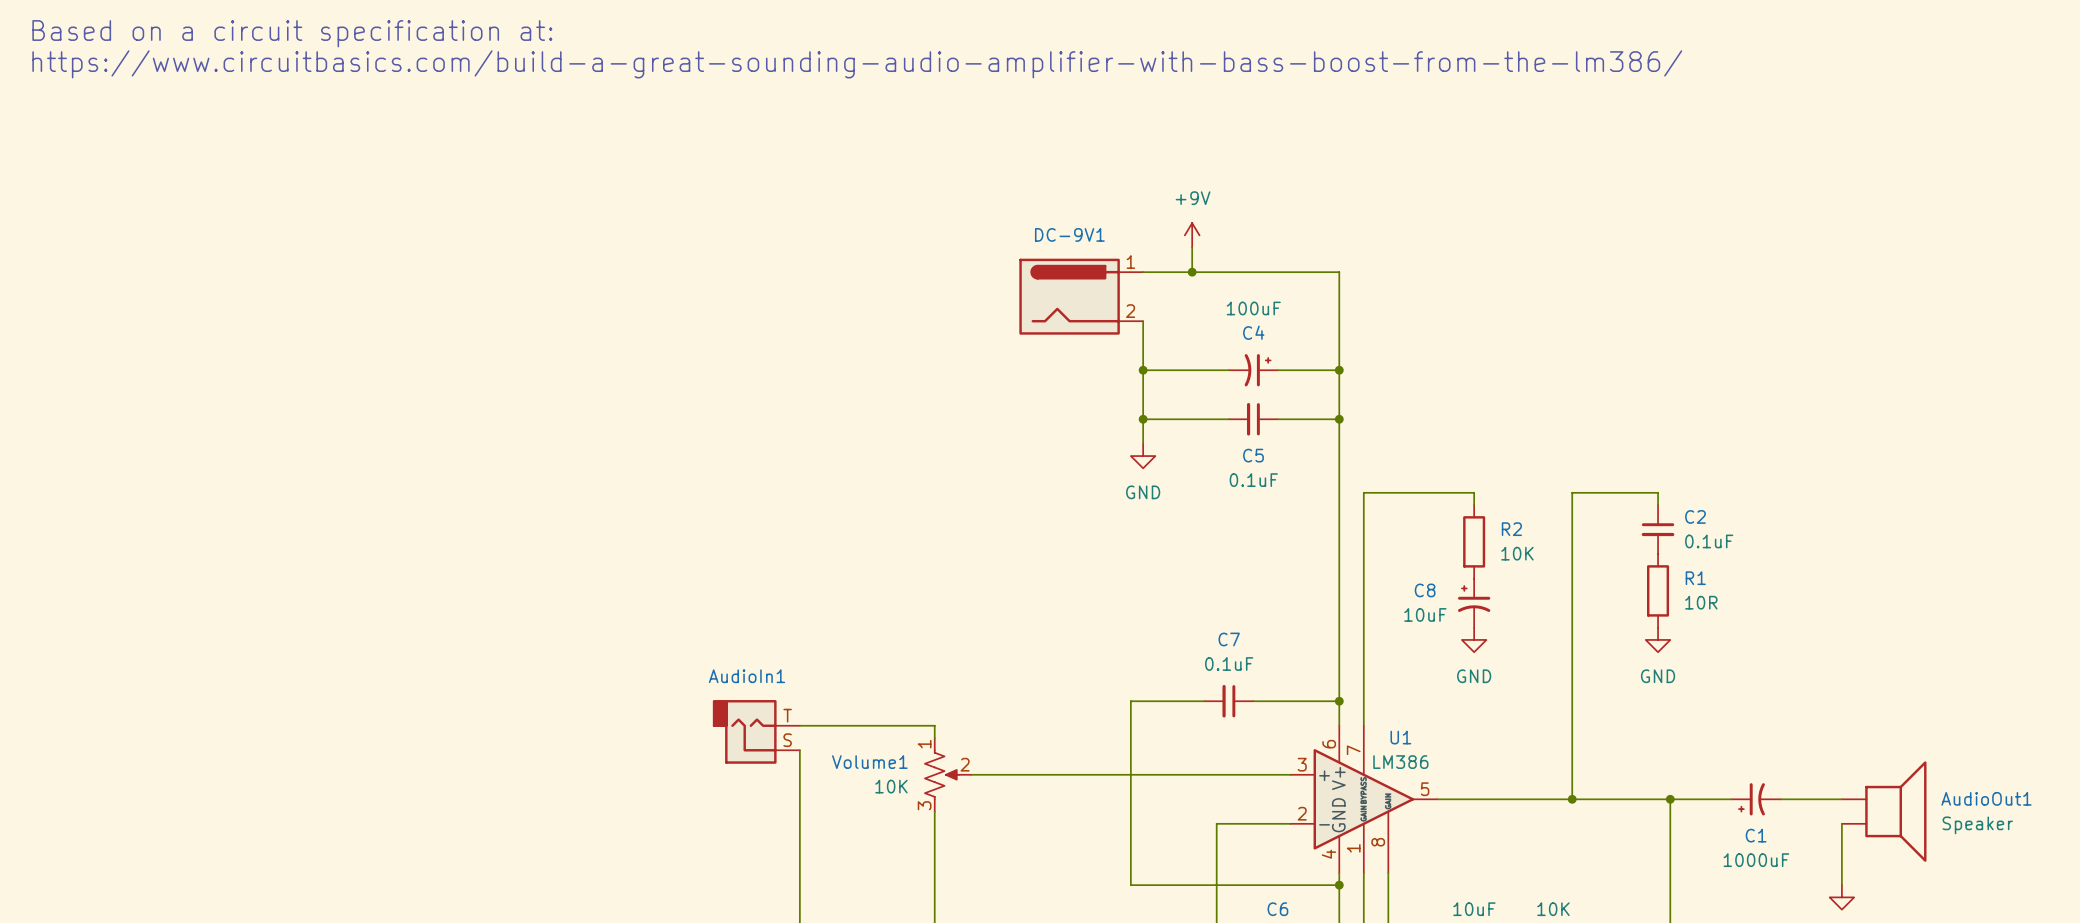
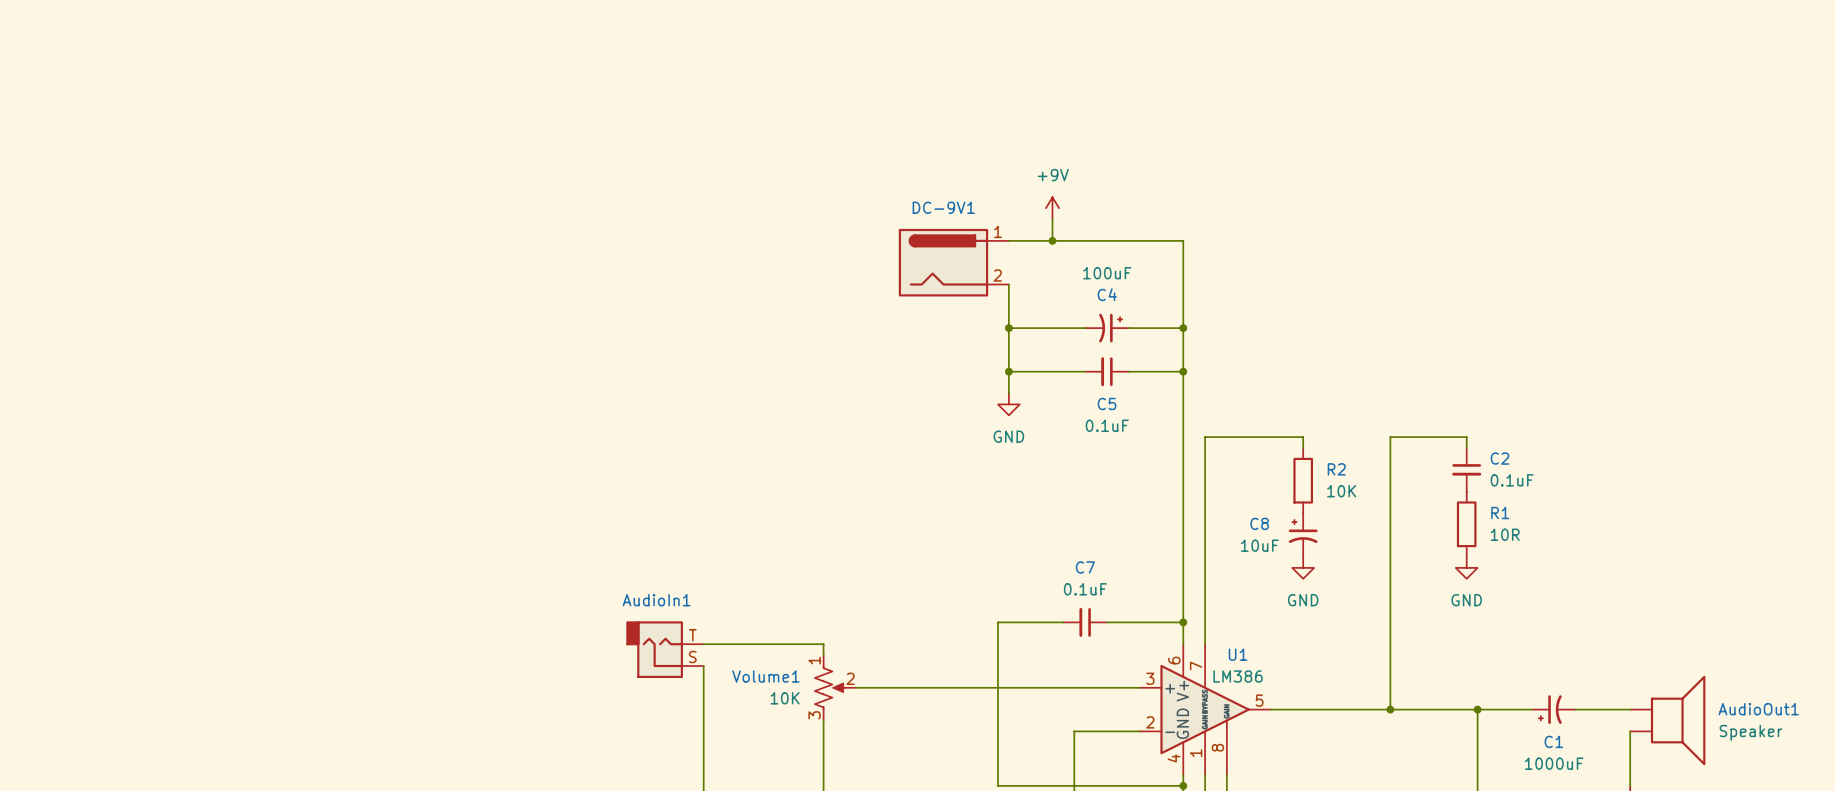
text: Based on a circuit specification at: (292, 33) -> none
text: https://www.circuitbasics.com/build-a-great-sounding-audio-amplifier-with-bass-boost-from-the-lm386/ (857, 64) -> none

